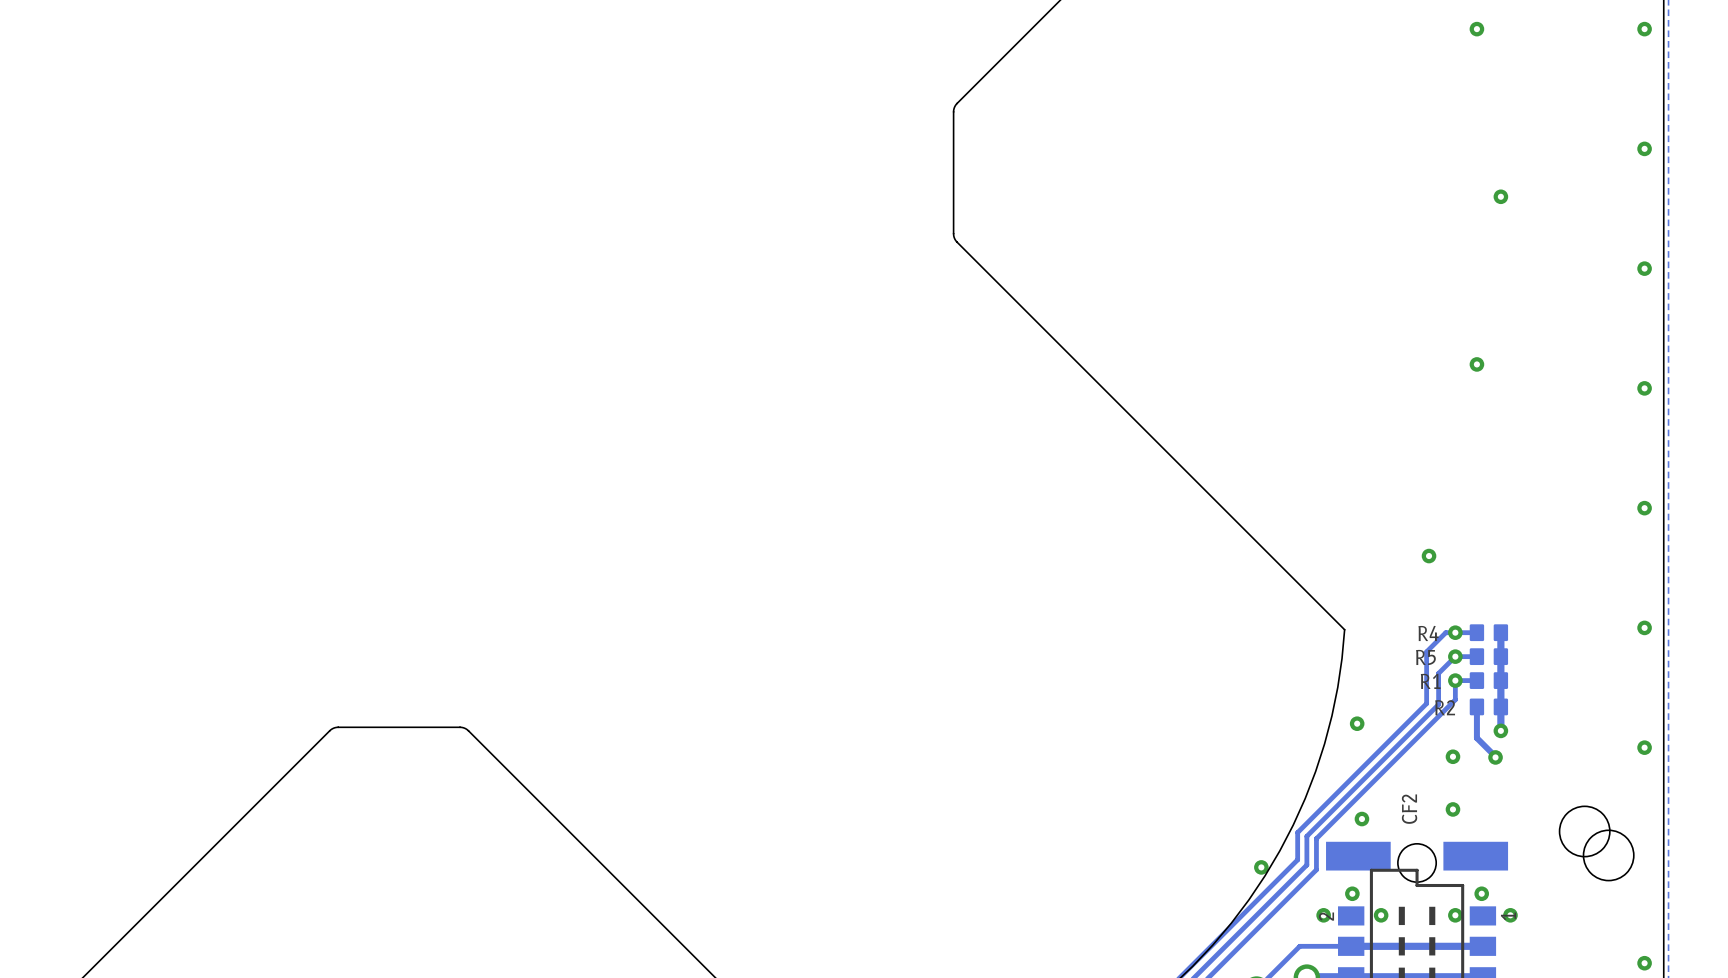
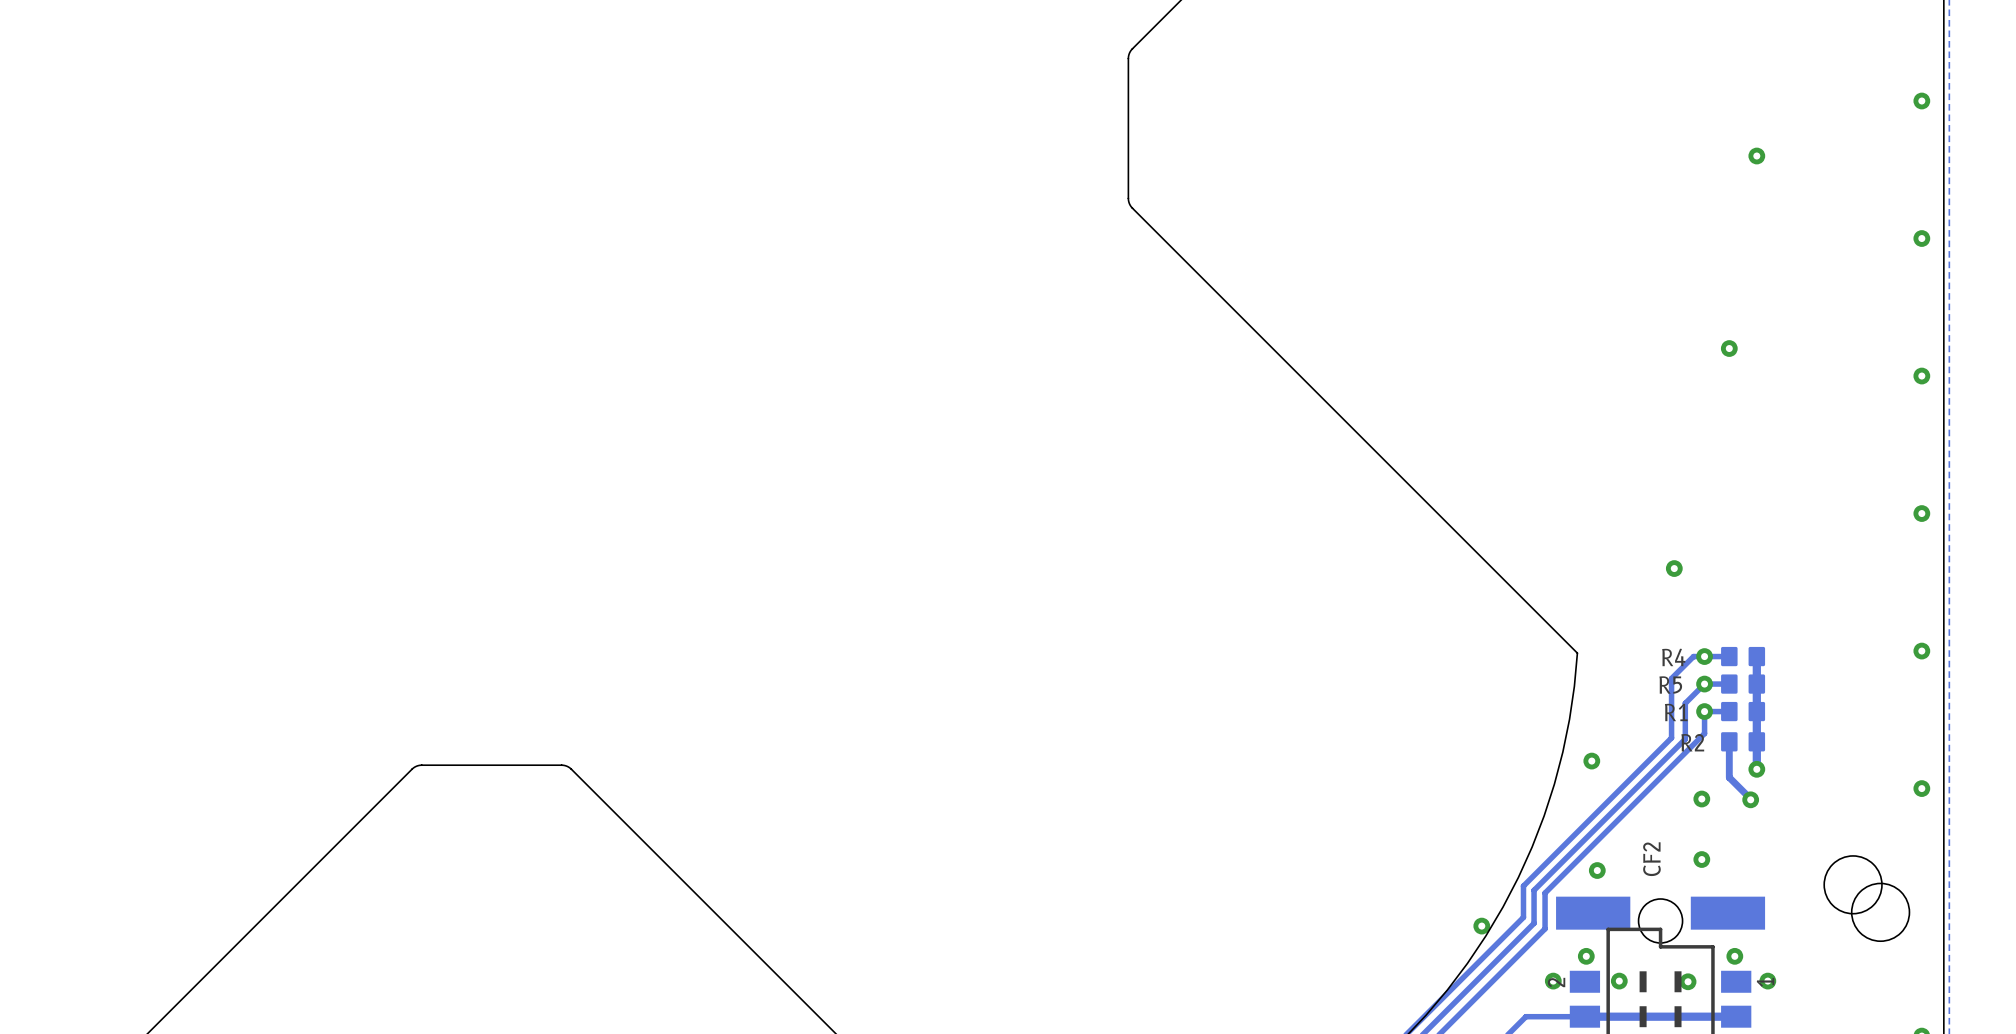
via position: (1455, 915) -> (1688, 981)

